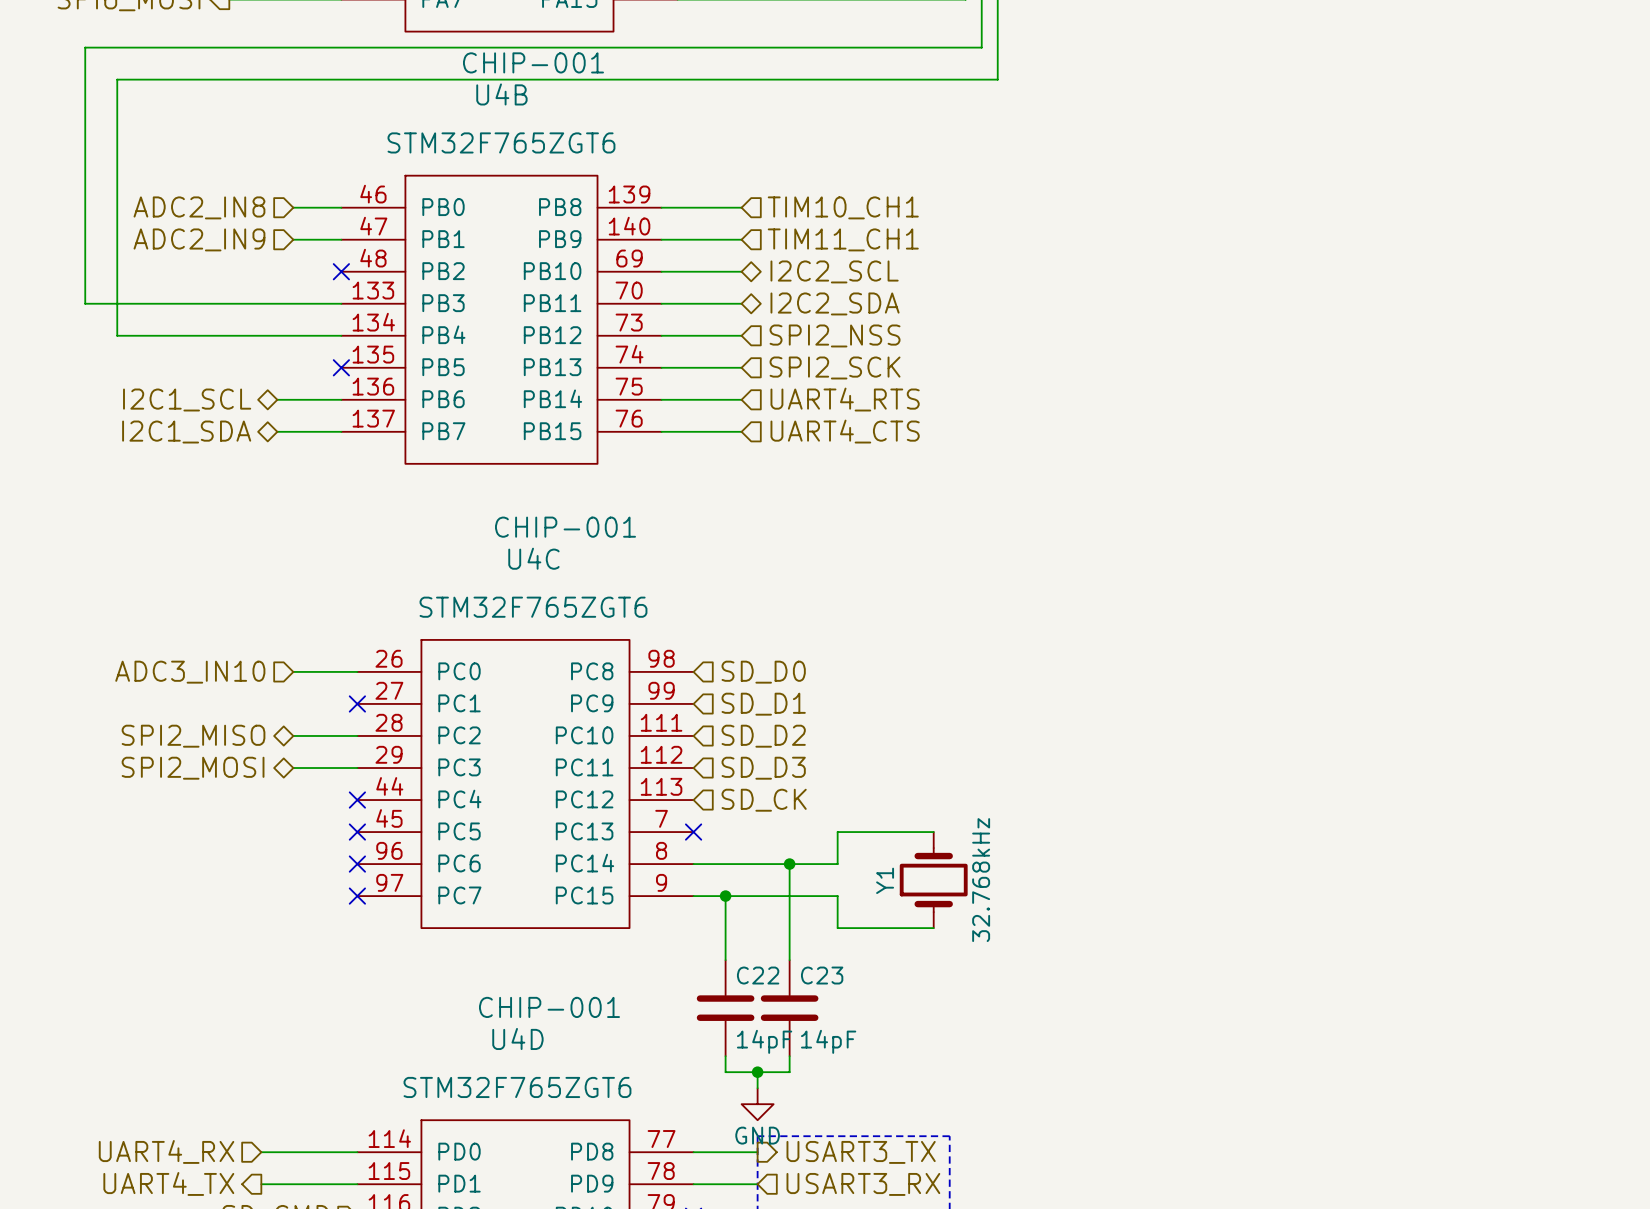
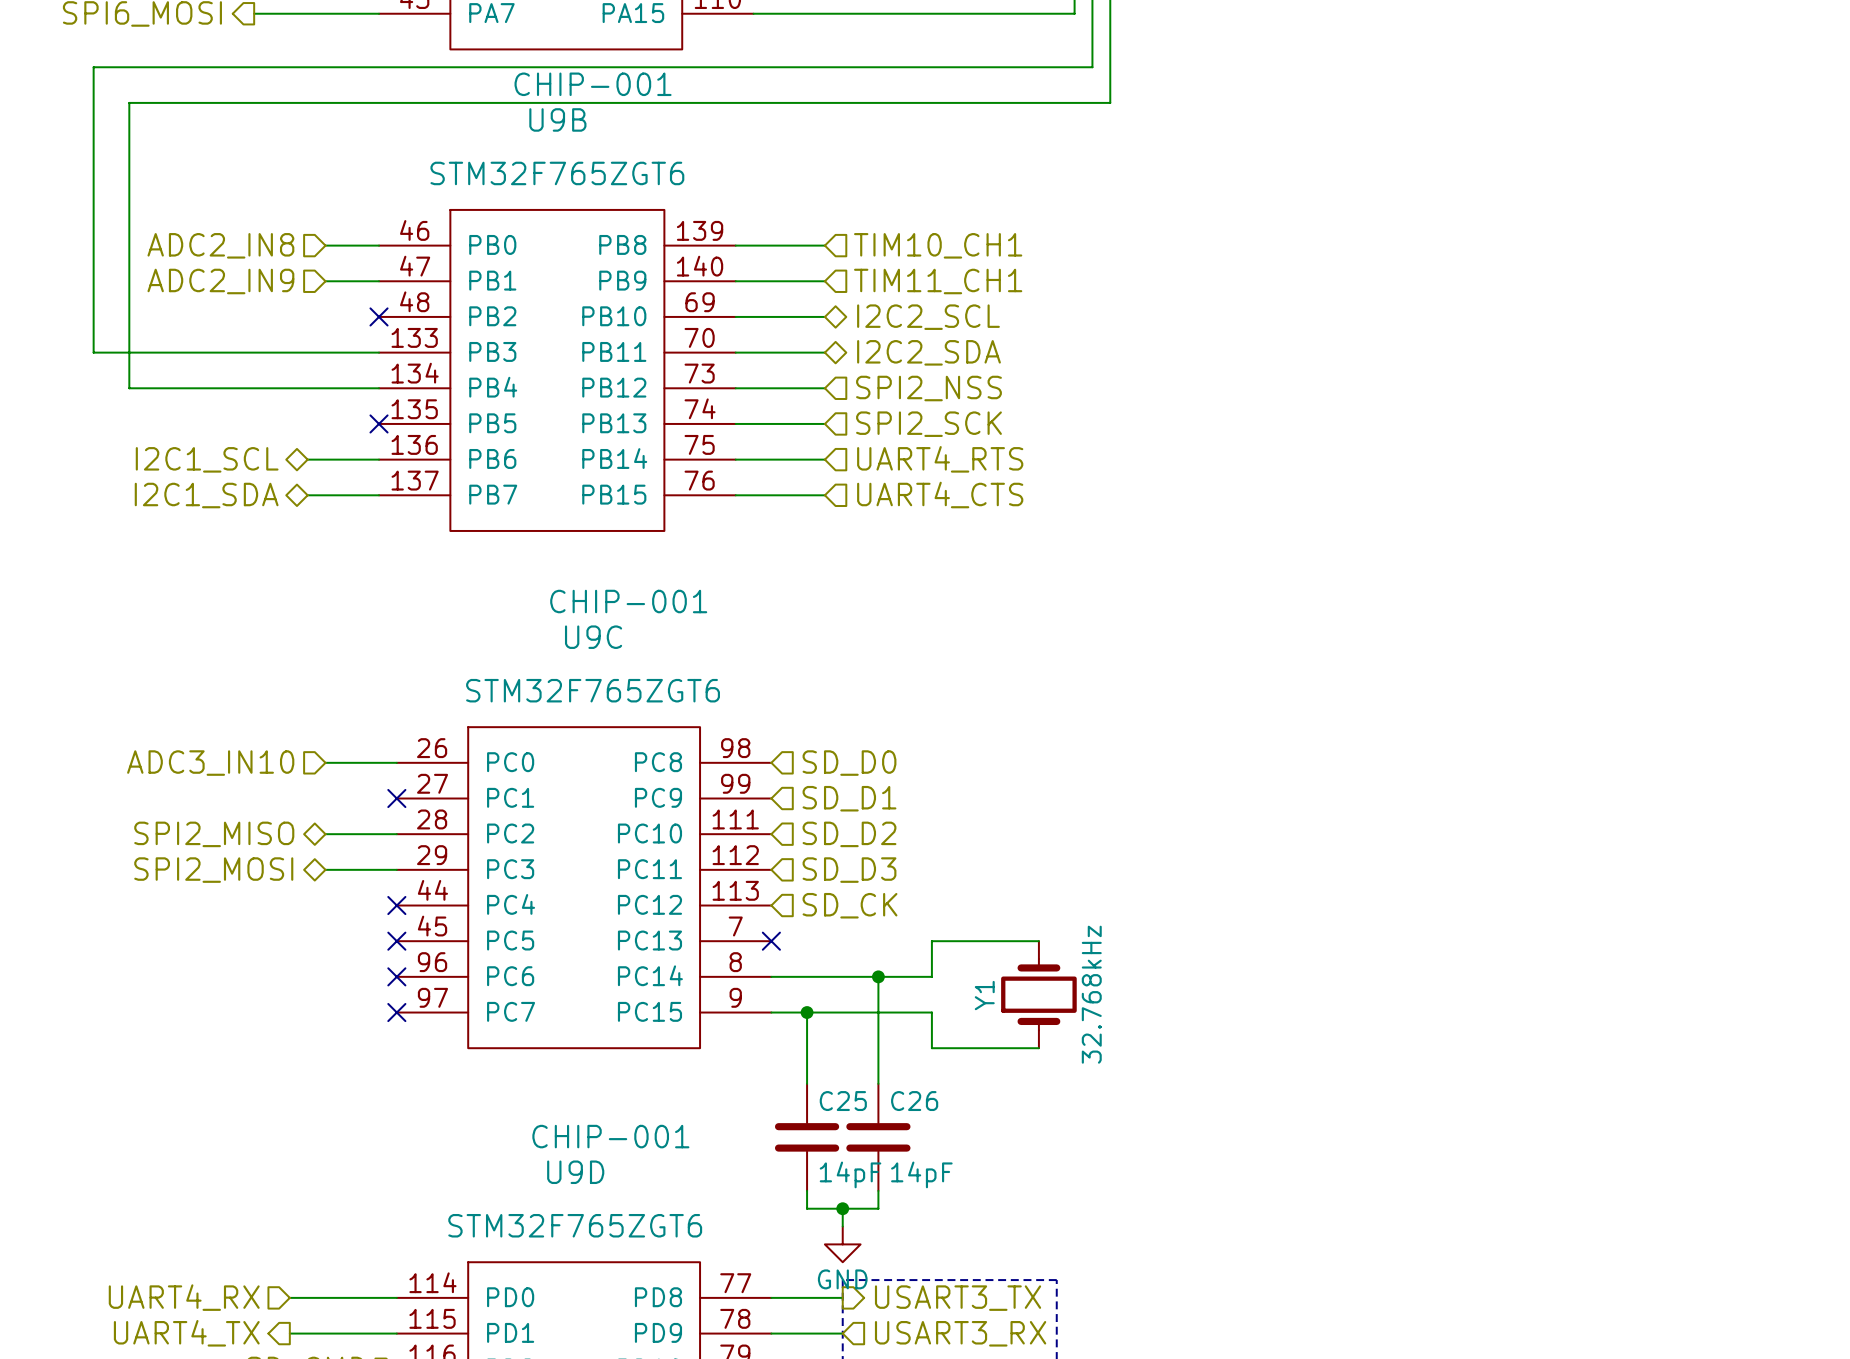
U4B name: U4B (501, 94) -> U9B (557, 119)
U4C name: U4C (533, 558) -> U9C (593, 637)
C22 name: C22 (758, 975) -> C25 (843, 1101)
C23 name: C23 (822, 975) -> C26 (914, 1101)
U4D name: U4D (517, 1038) -> U9D (575, 1172)

